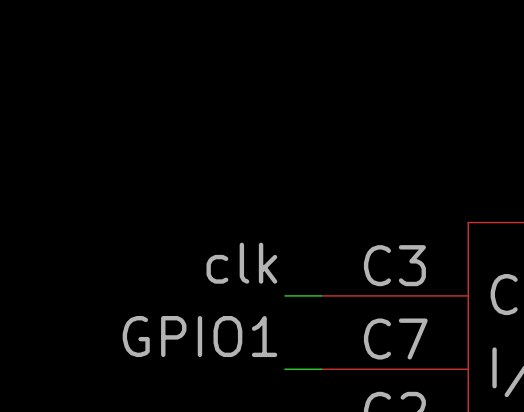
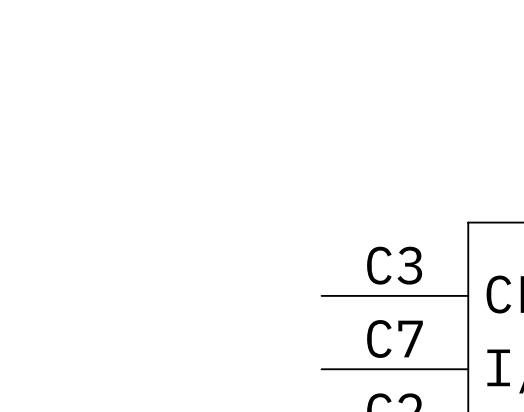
label: clk (241, 263) -> none
wire: (284, 295) (321, 295) -> none
label: GPIO1 (199, 336) -> none
wire: (284, 369) (321, 369) -> none

